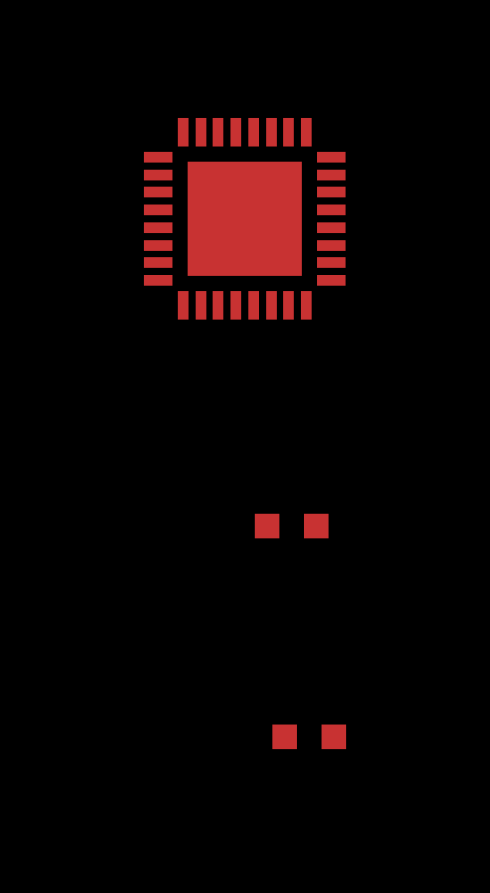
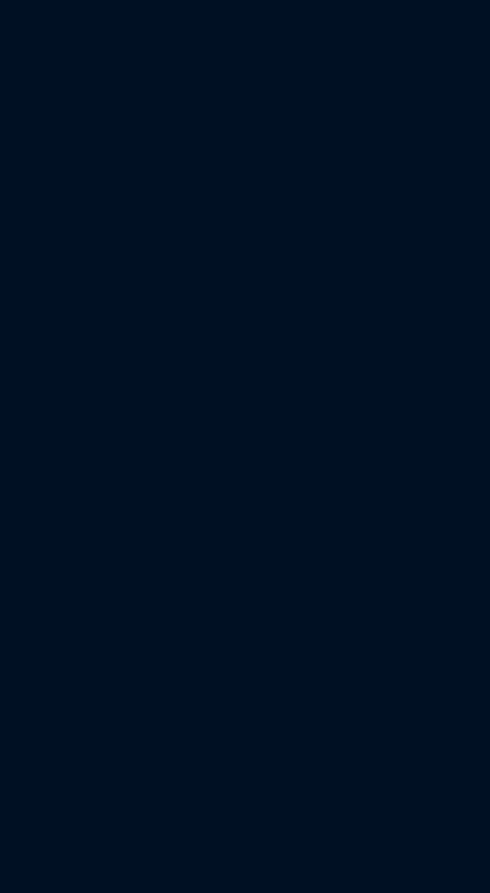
part: (244, 218) -> none
part: (291, 526) -> none
part: (309, 736) -> none

